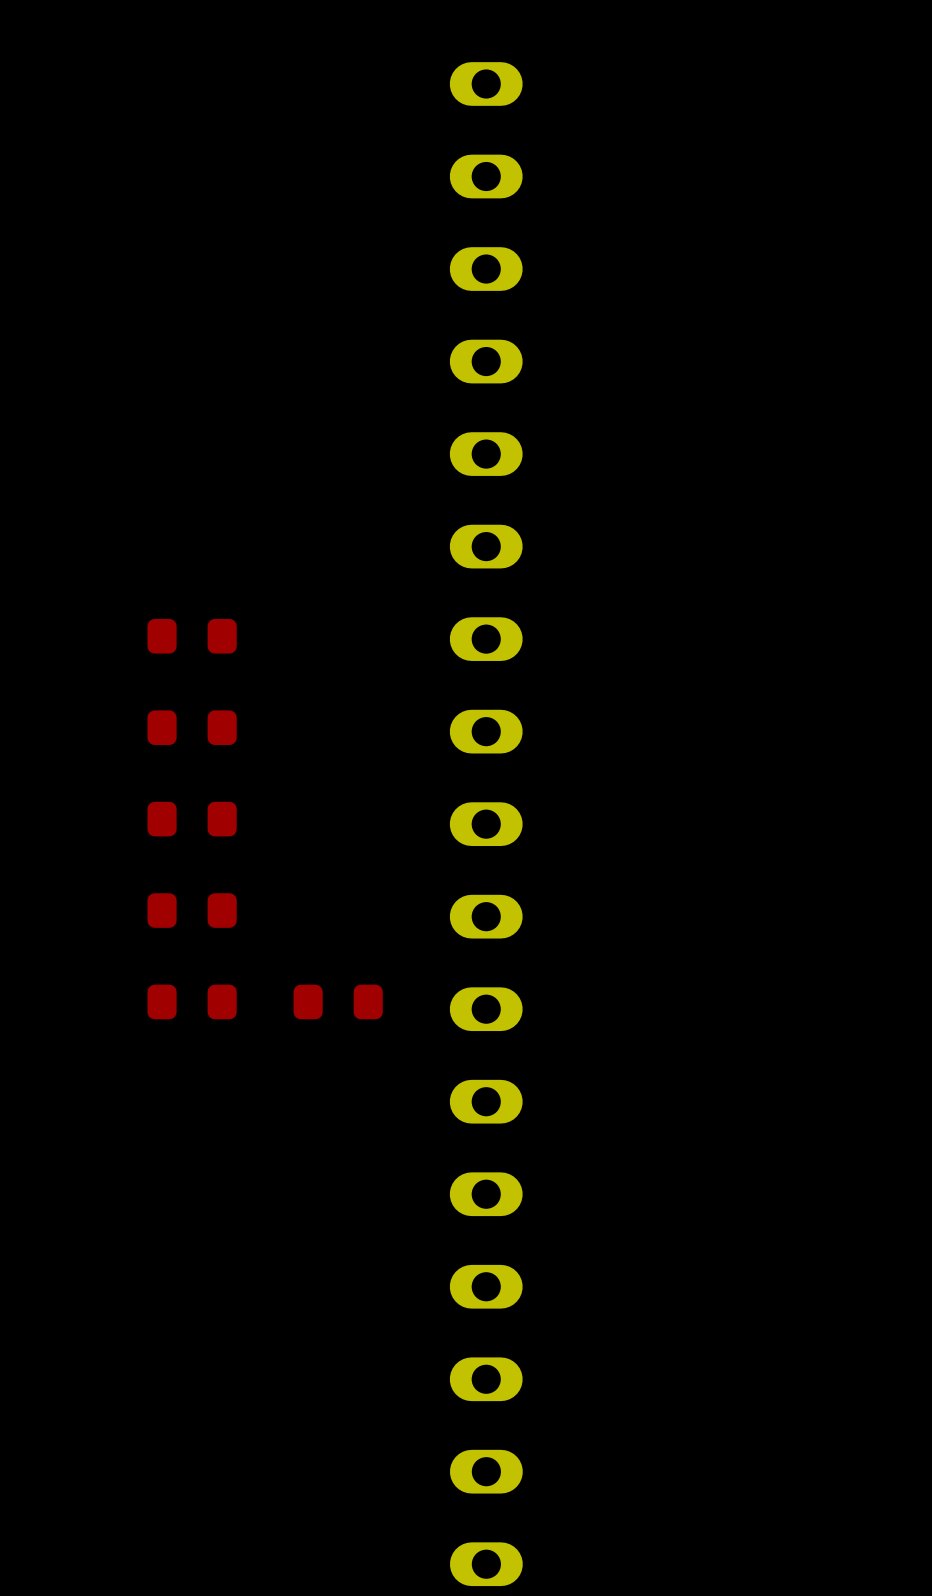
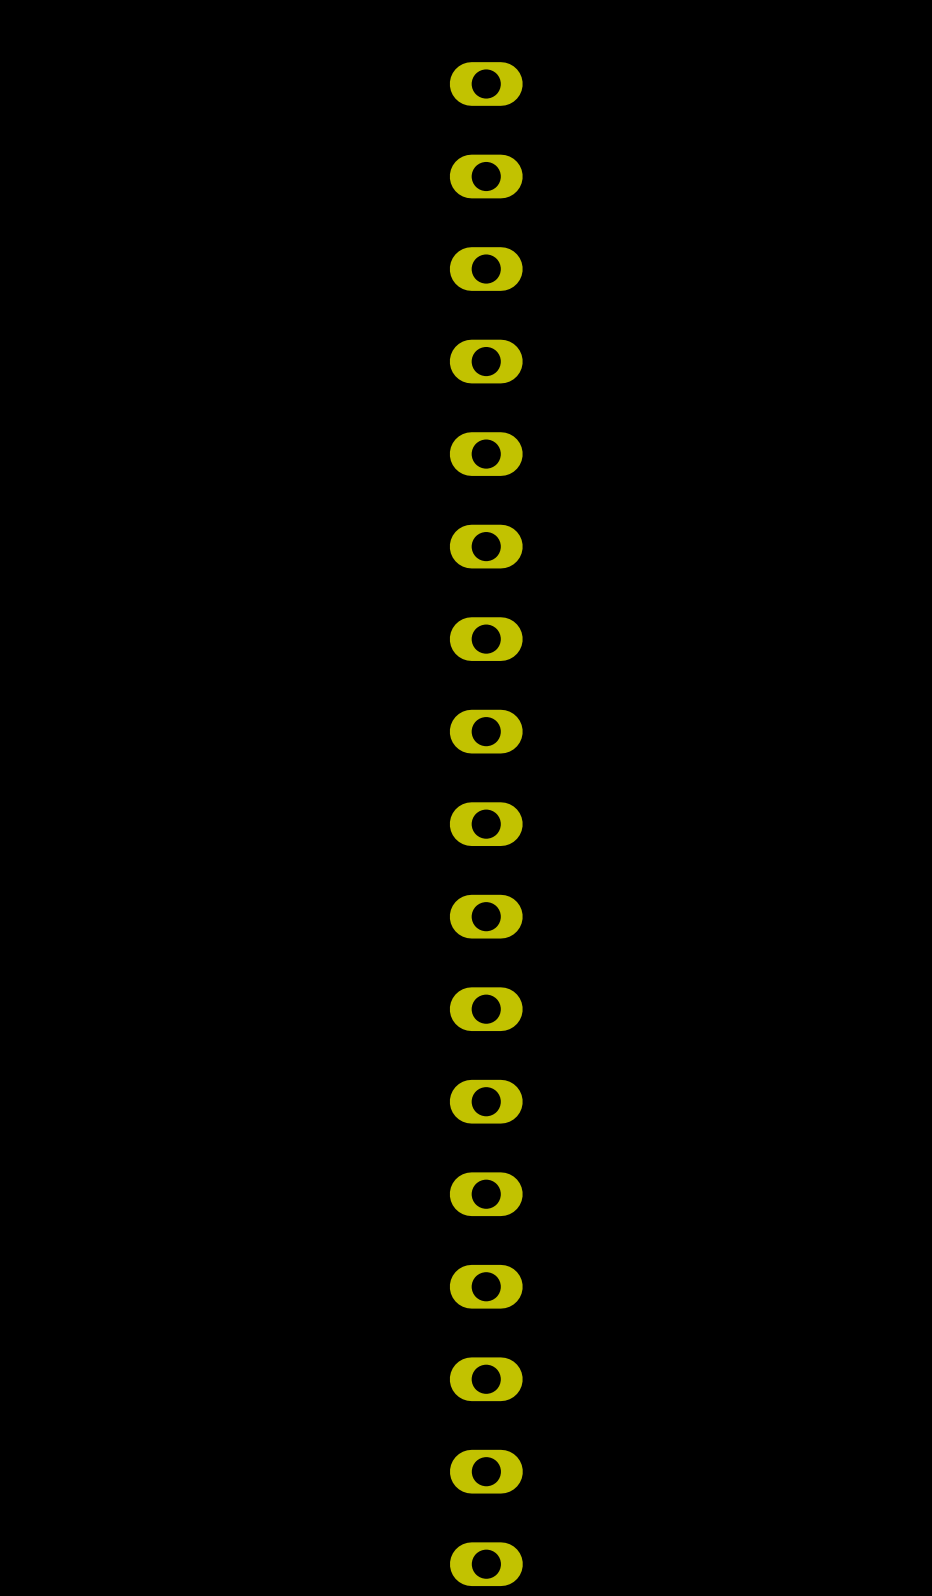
part: (192, 636) -> none
part: (192, 727) -> none
part: (192, 819) -> none
part: (192, 910) -> none
part: (192, 1001) -> none
part: (338, 1001) -> none

